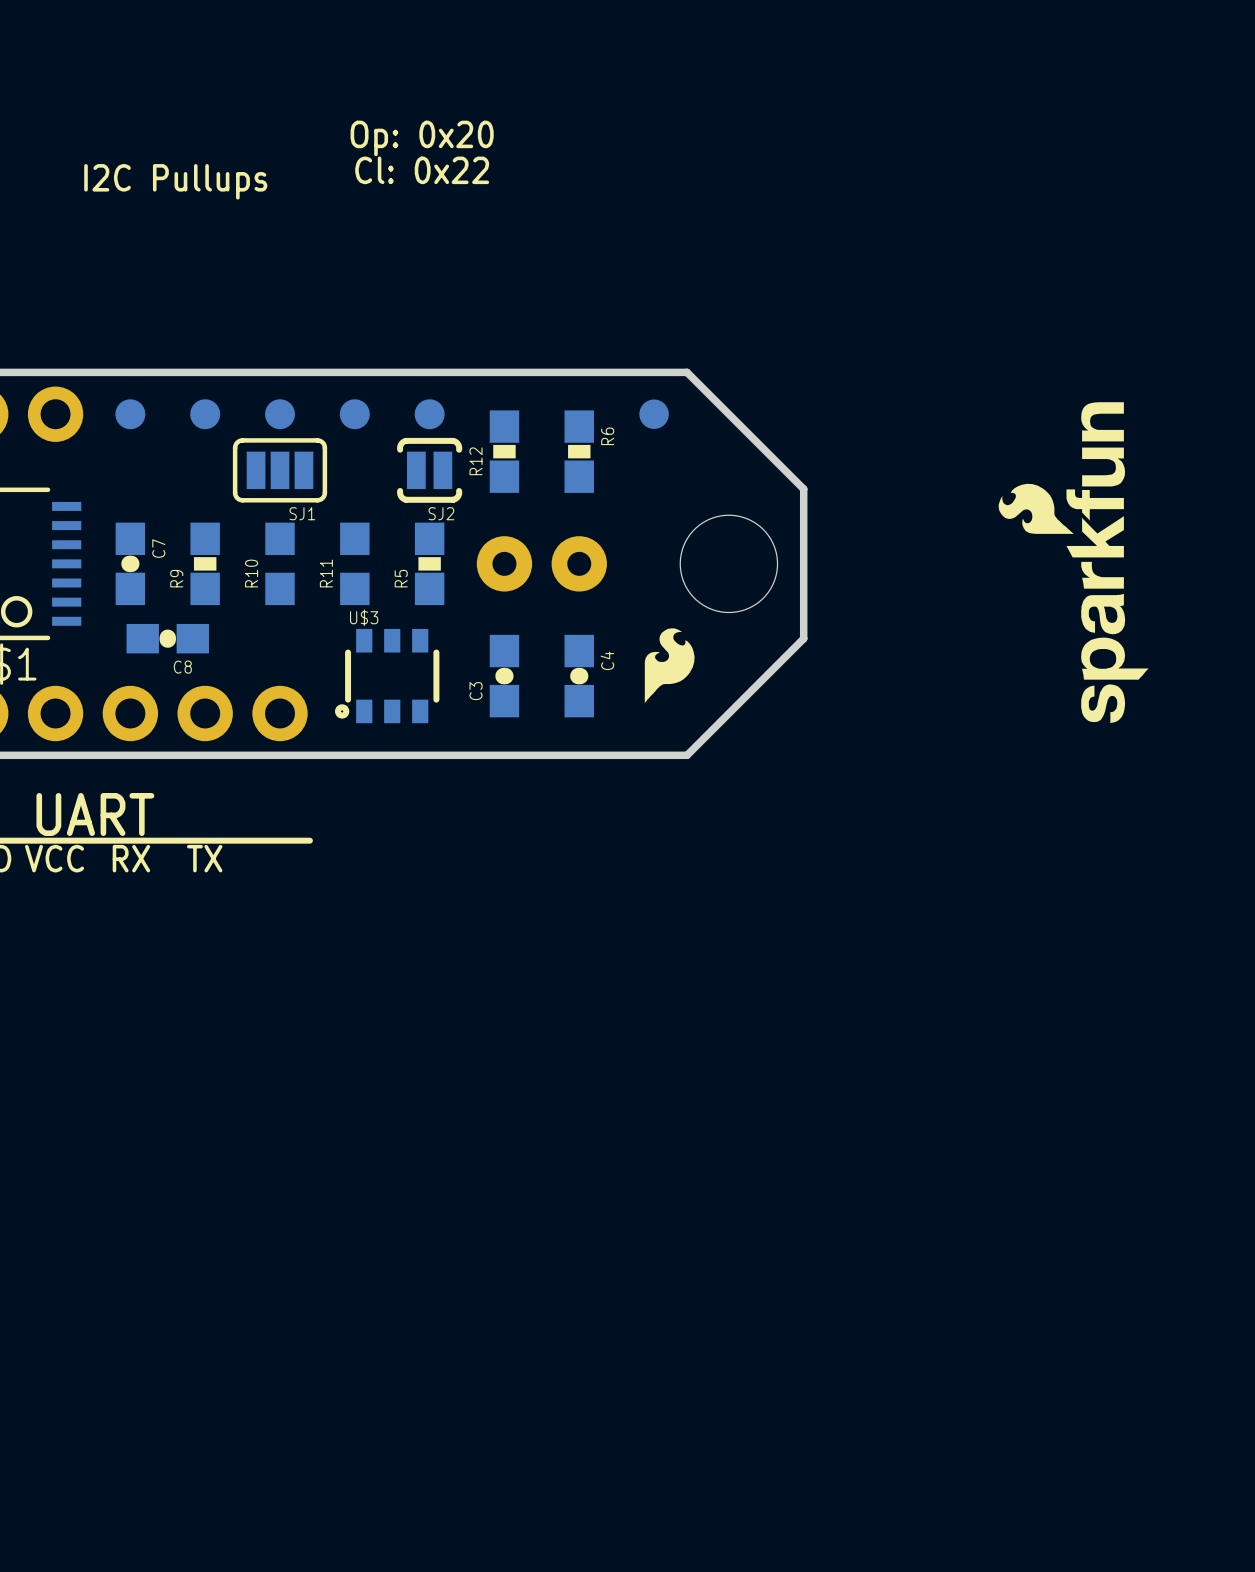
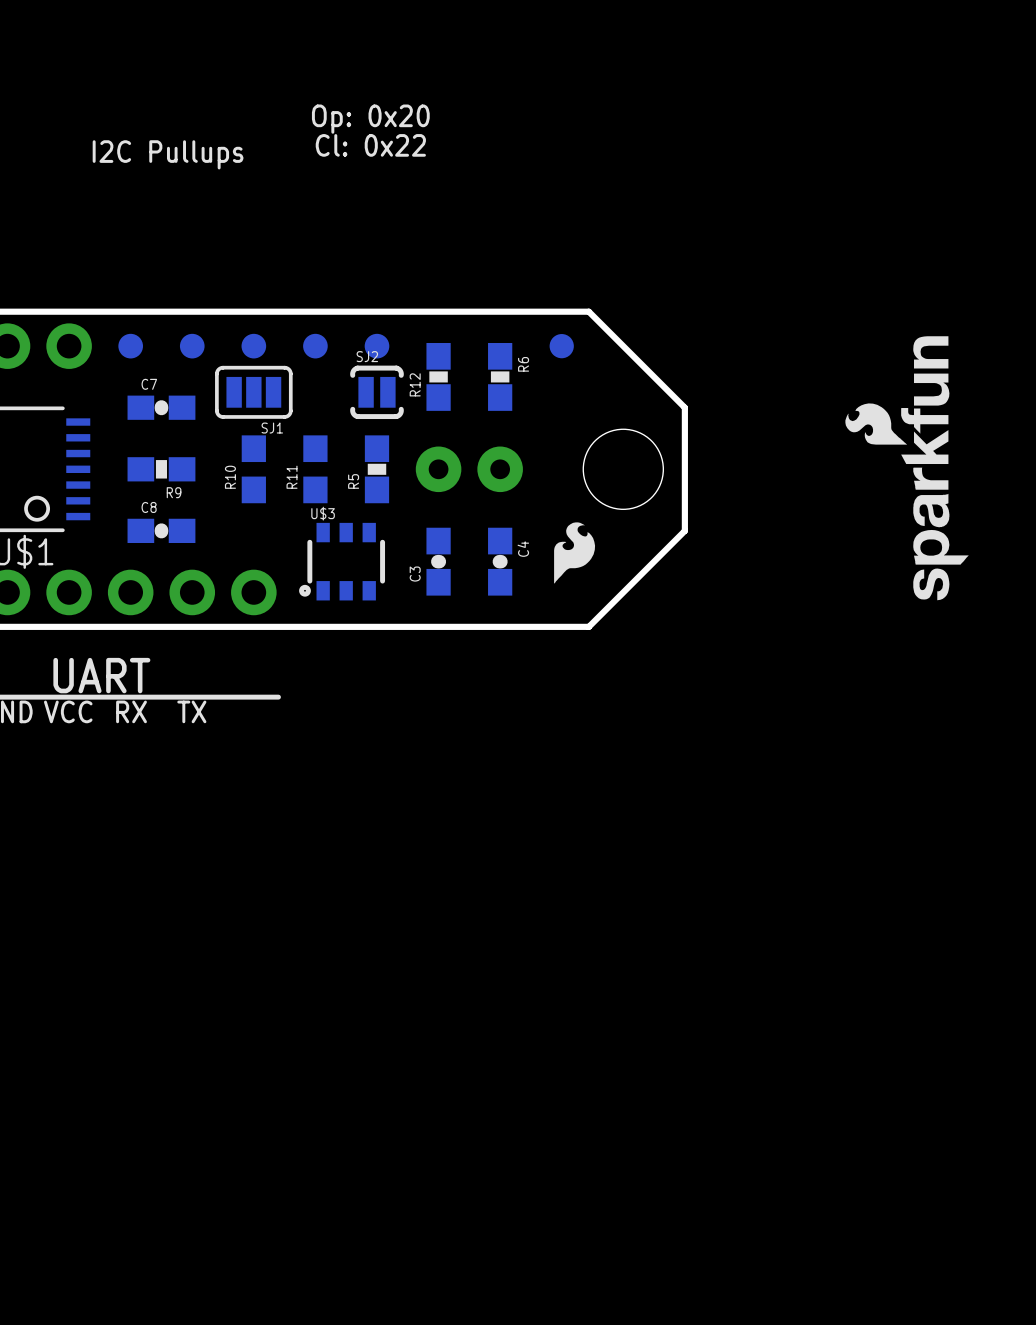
SJ2 name position: SJ2 (441, 513) -> SJ2 (367, 356)
C7 rotation: 0° (130, 563) -> 90° clockwise (161, 407)
C7 position: (130, 563) -> (161, 407)
R9 rotation: 0° (205, 563) -> 90° clockwise (161, 469)
C8 name position: C8 (182, 667) -> C8 (149, 507)

